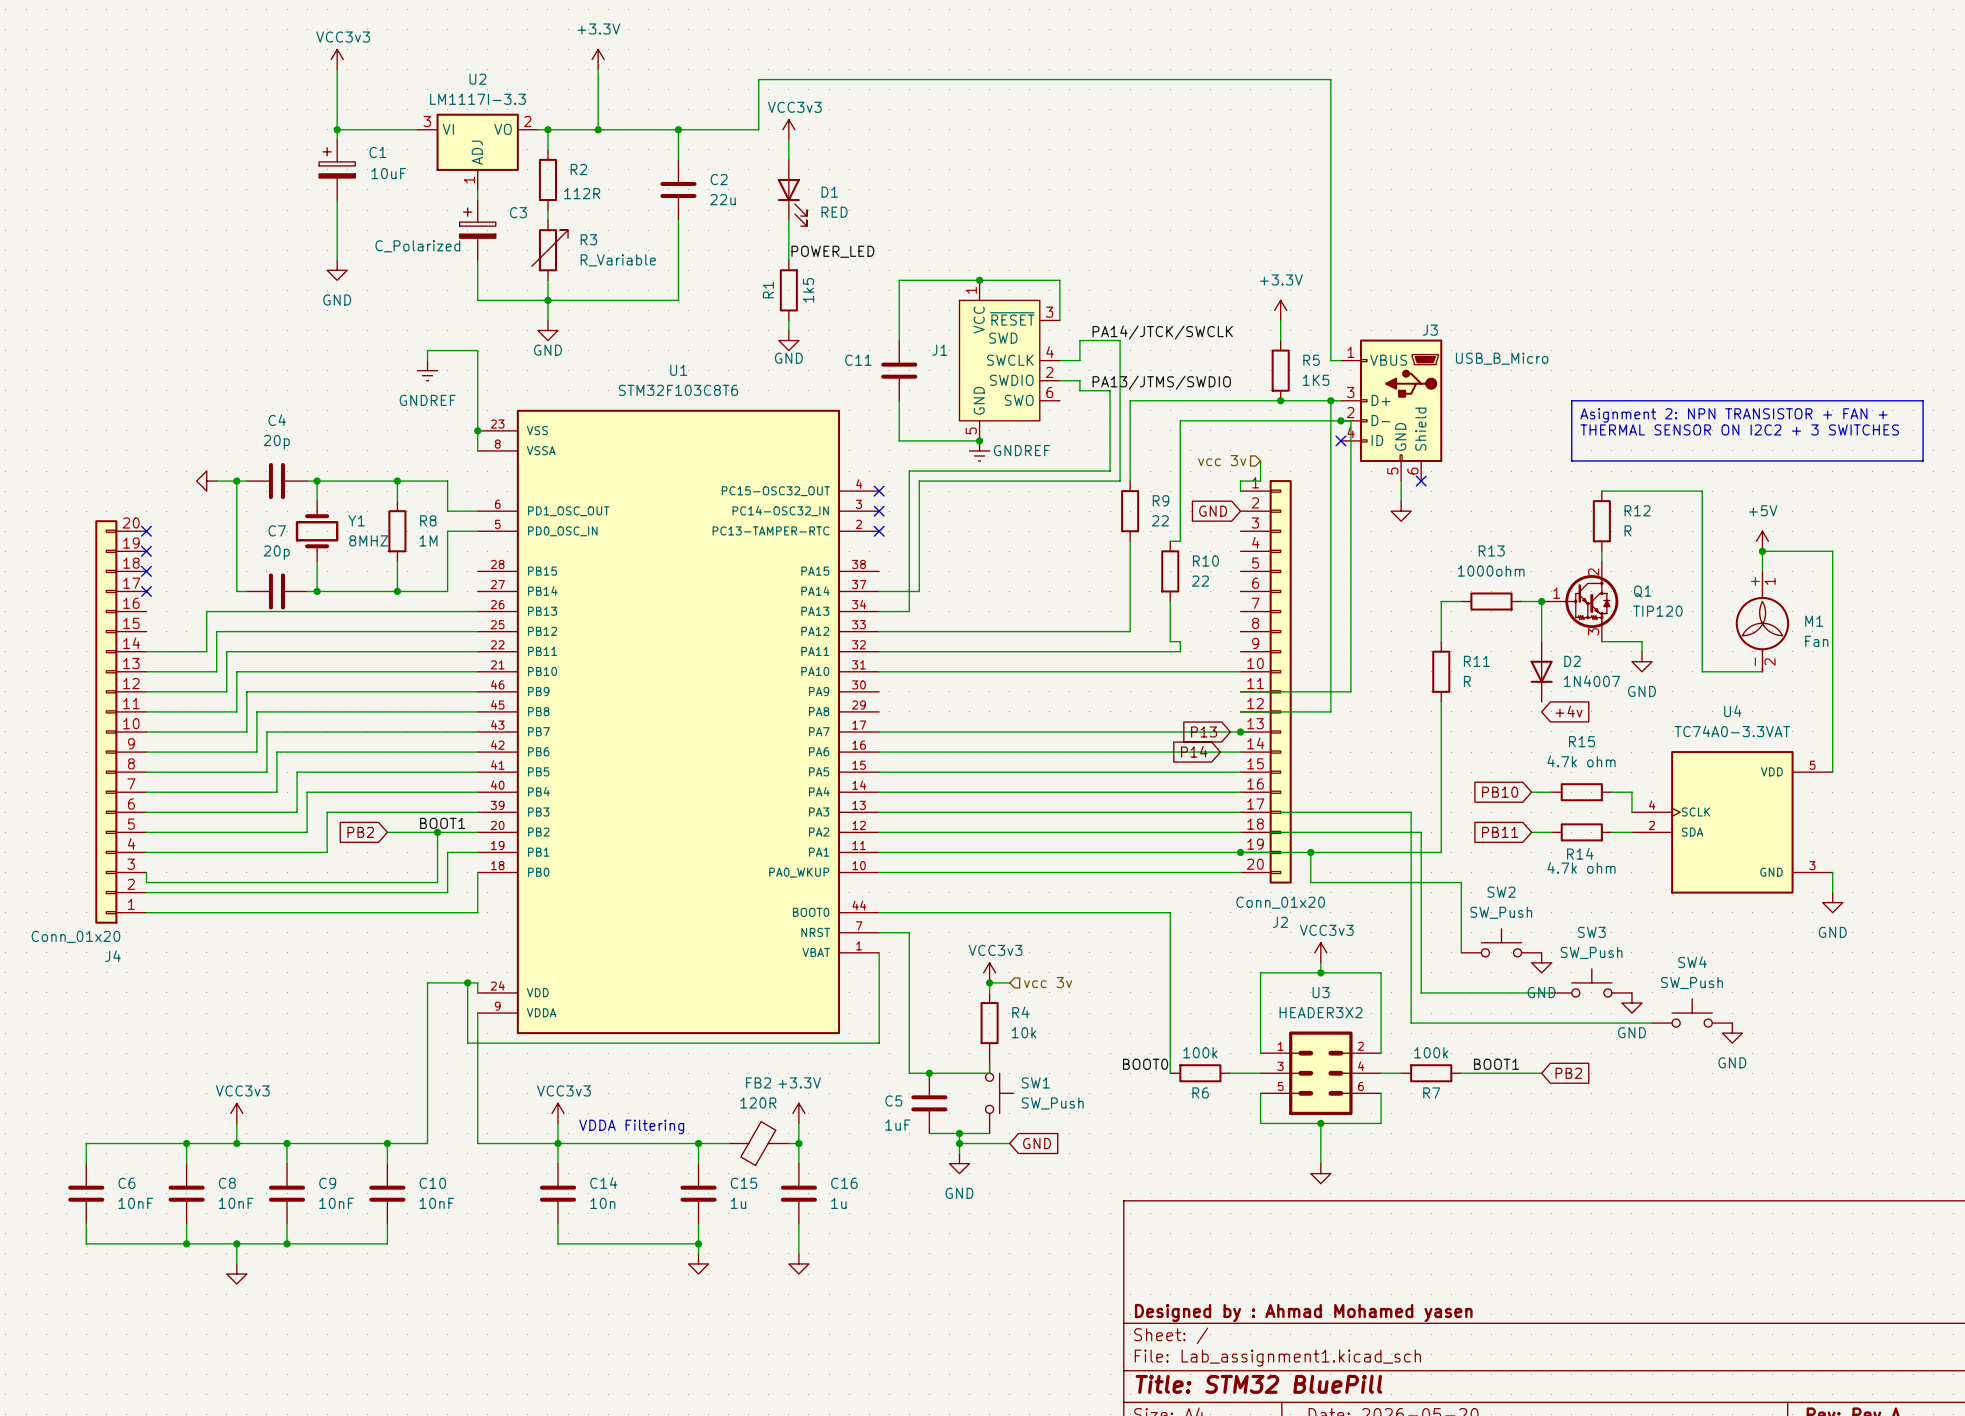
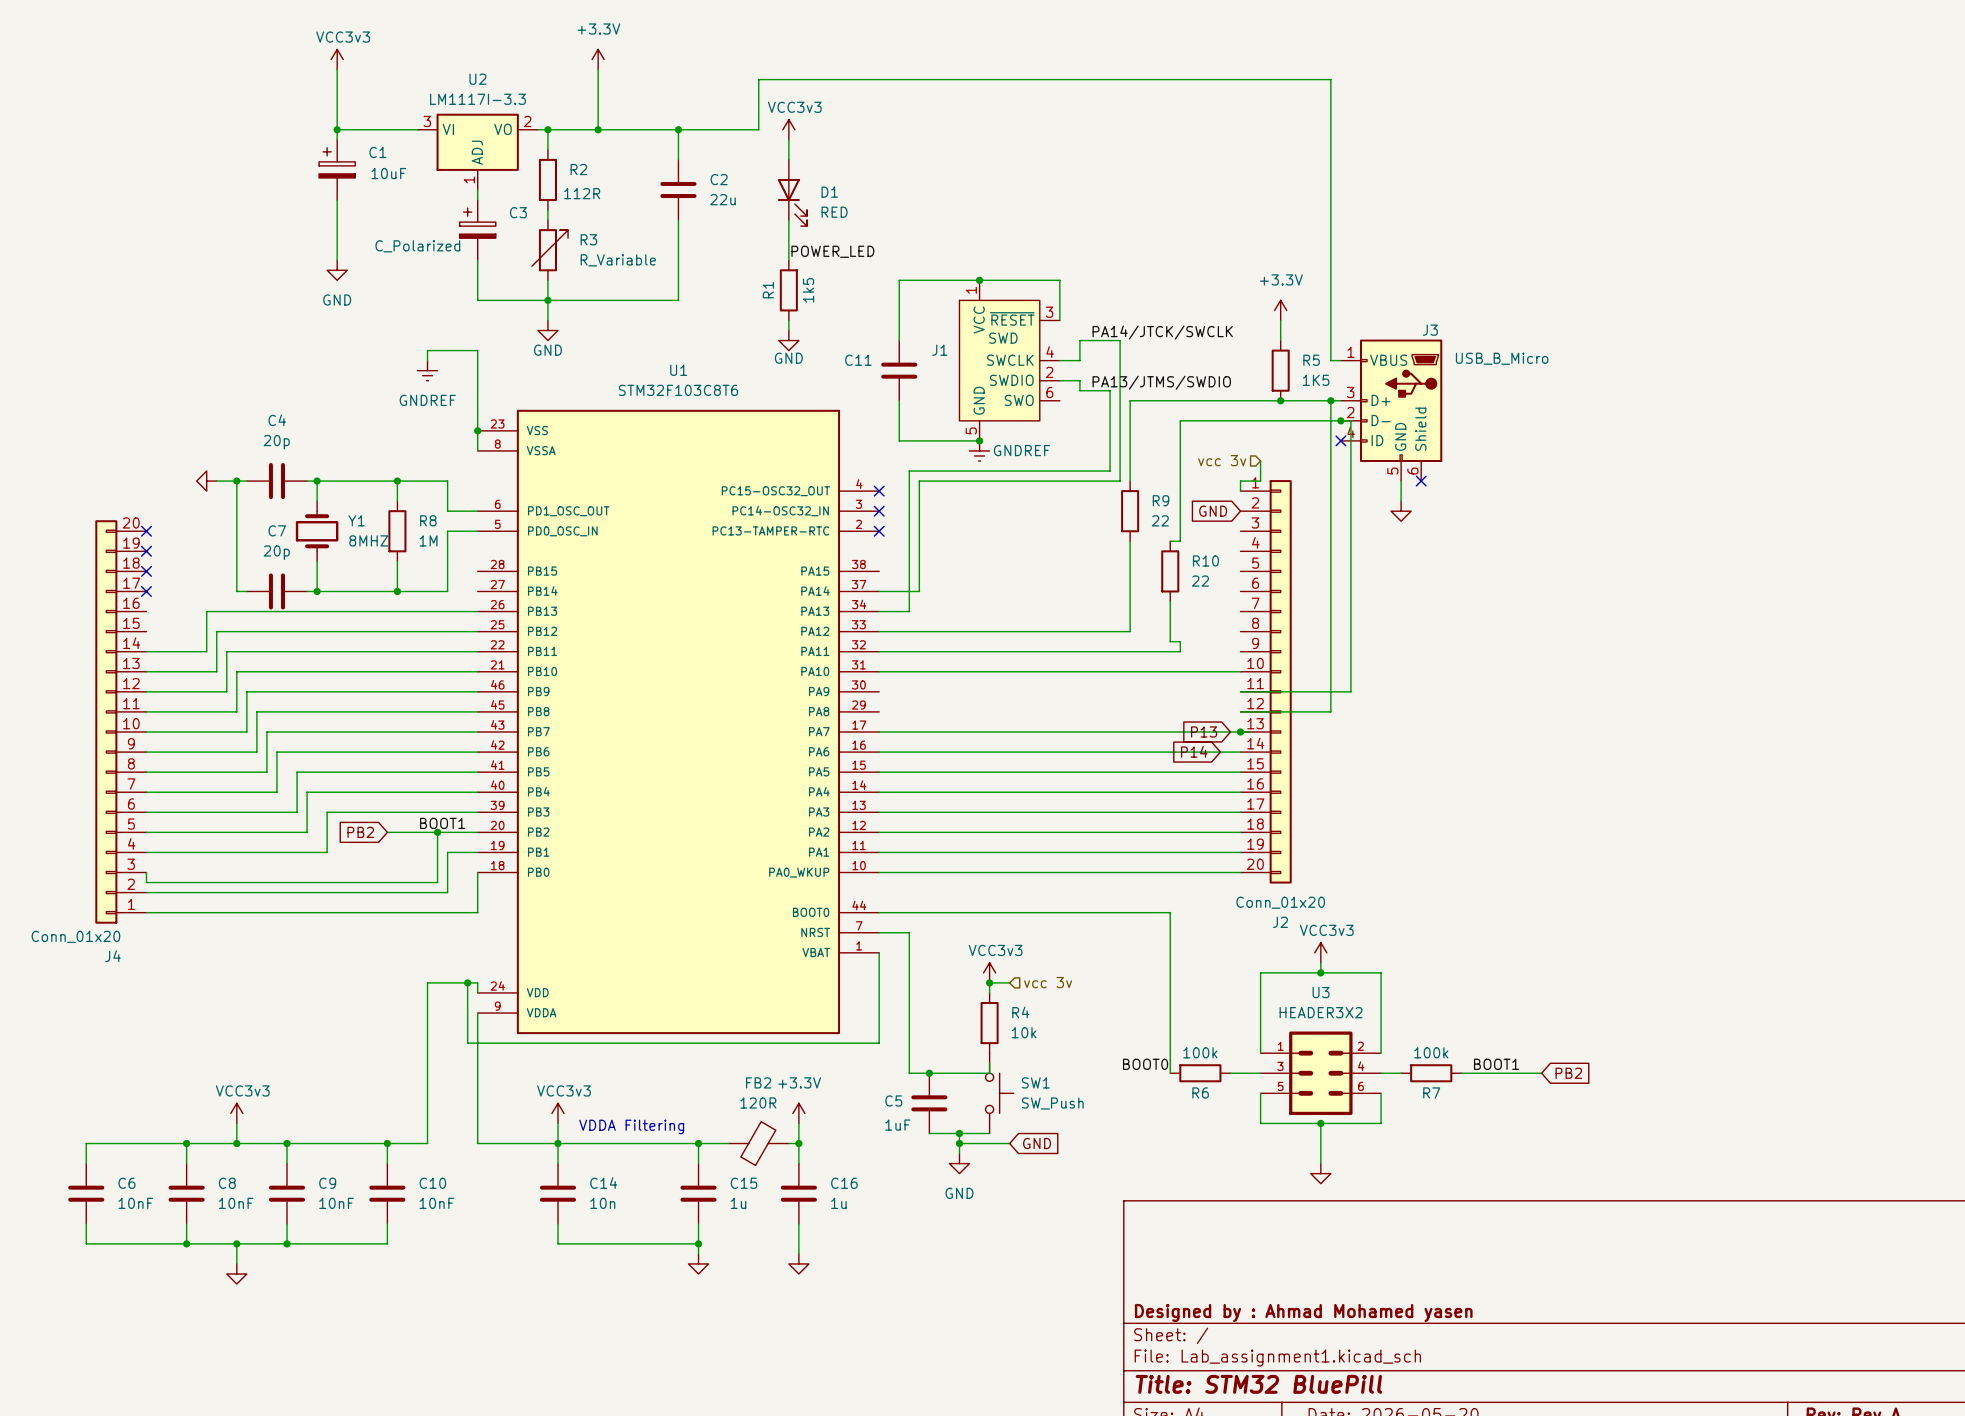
line: (1571, 400) (1923, 400) (1923, 460) (1571, 460) (1571, 400) -> none
text: Asignment 2: NPN TRANSISTOR + FAN + (1733, 415) -> none
text: THERMAL SENSOR ON I2C2 + 3 SWITCHES (1739, 429) -> none
wire: (1601, 491) (1702, 491) (1702, 671) (1762, 671) -> none
R12: R (1601, 521) -> none
power symbol: +5V (1762, 541) -> none
wire: (1601, 551) (1601, 561) -> none
junction: (1762, 551) -> none
wire: (1762, 571) (1762, 551) (1832, 551) (1832, 772) -> none
wire: (1461, 601) (1441, 601) (1441, 641) -> none
R13: 1000ohm (1491, 601) -> none
wire: (1521, 601) (1541, 601) (1541, 641) -> none
junction: (1541, 601) -> none
Q1: TIP120 (1579, 601) -> none
M1: Fan (1762, 621) -> none
wire: (1601, 641) (1642, 641) (1642, 651) -> none
power symbol: GND (1642, 661) -> none
R11: R (1441, 671) -> none
D2: 1N4007 (1541, 671) -> none
wire: (1441, 701) (1441, 852) (1240, 852) -> none
global label: +4v (1569, 711) -> none
global label: PB10 (1500, 792) -> none
wire: (1531, 792) (1551, 792) -> none
R15: 4.7k ohm (1581, 792) -> none
wire: (1611, 792) (1631, 792) (1631, 812) -> none
wire: (1280, 812) (1411, 812) (1411, 1023) (1652, 1023) -> none
U4: TC74A0-3.3VAT (1732, 822) -> none
wire: (1270, 832) (1421, 832) (1421, 992) (1551, 992) -> none
global label: PB11 (1500, 832) -> none
wire: (1531, 832) (1551, 832) -> none
R14: 4.7k ohm (1581, 832) -> none
wire: (1611, 832) (1631, 832) -> none
junction: (1240, 852) -> none
wire: (1310, 852) (1310, 882) (1461, 882) (1461, 952) -> none
junction: (1310, 852) -> none
wire: (1832, 872) (1832, 892) -> none
power symbol: GND (1832, 902) -> none
SW2: SW_Push (1501, 942) -> none
power symbol: GND (1541, 962) -> none
SW3: SW_Push (1591, 982) -> none
power symbol: GND (1631, 1003) -> none
SW4: SW_Push (1692, 1013) -> none
power symbol: GND (1732, 1033) -> none

